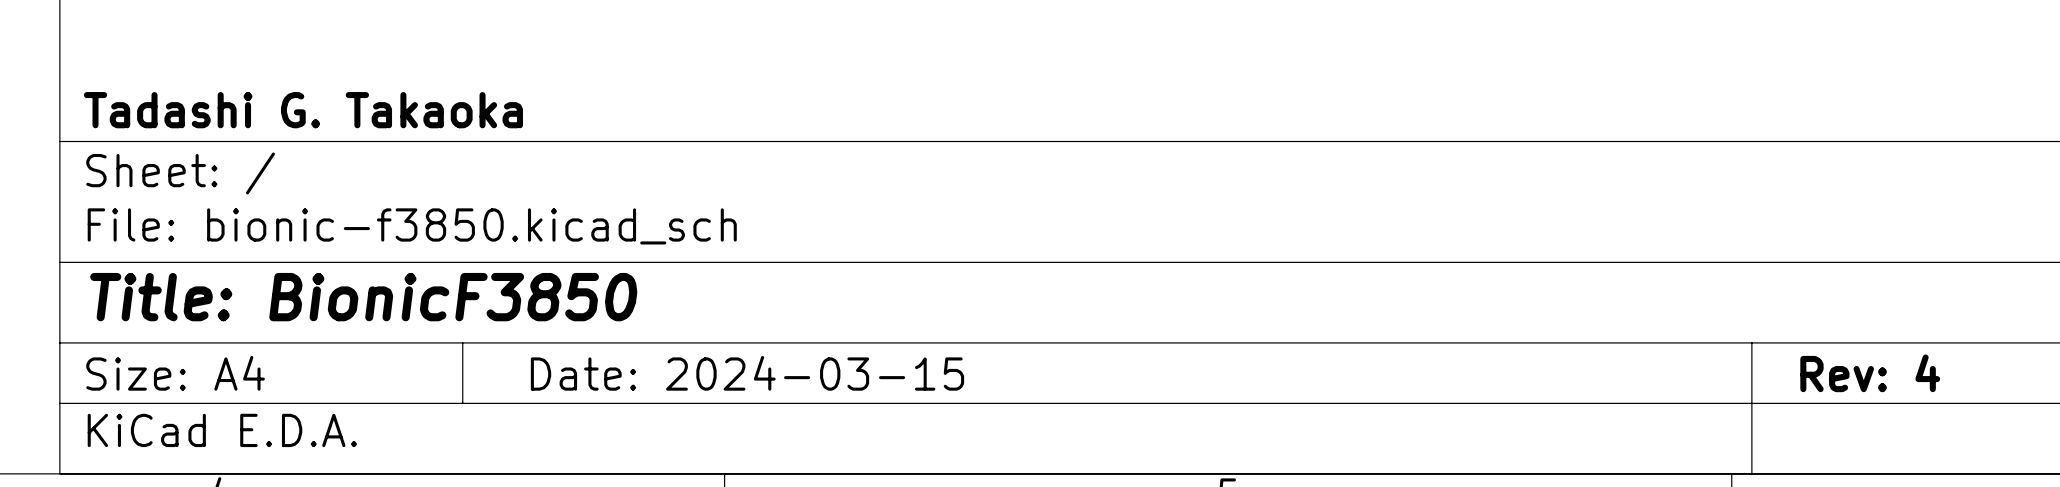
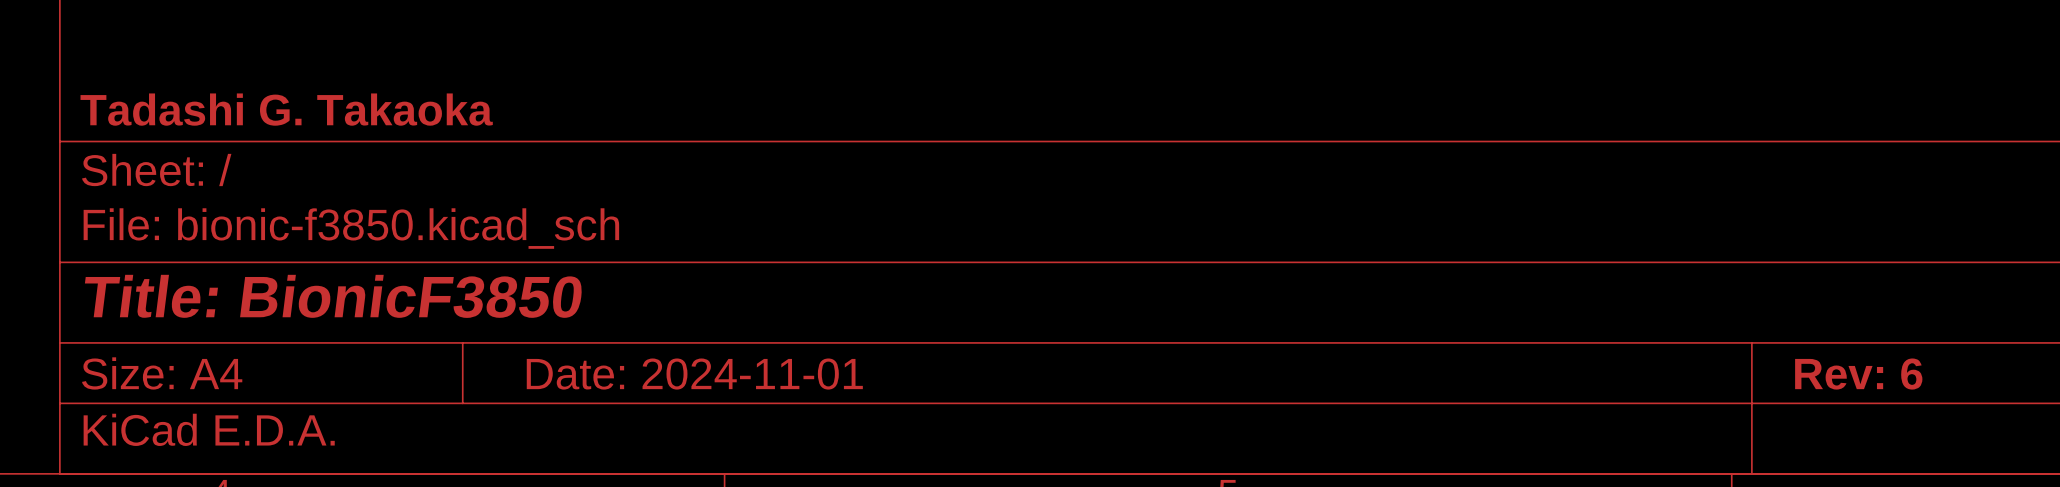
title block: Date: 2024-03-15 (747, 373) -> Date: 2024-11-01 (694, 374)
title block: Rev: 4 (1870, 373) -> Rev: 6 (1858, 374)

